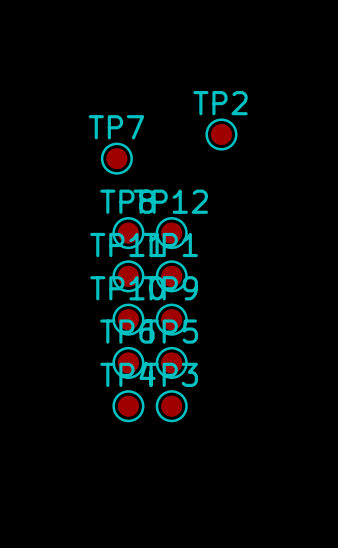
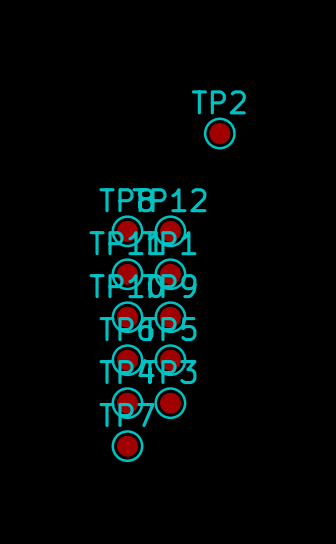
TP7 position: (116, 158) -> (127, 446)

